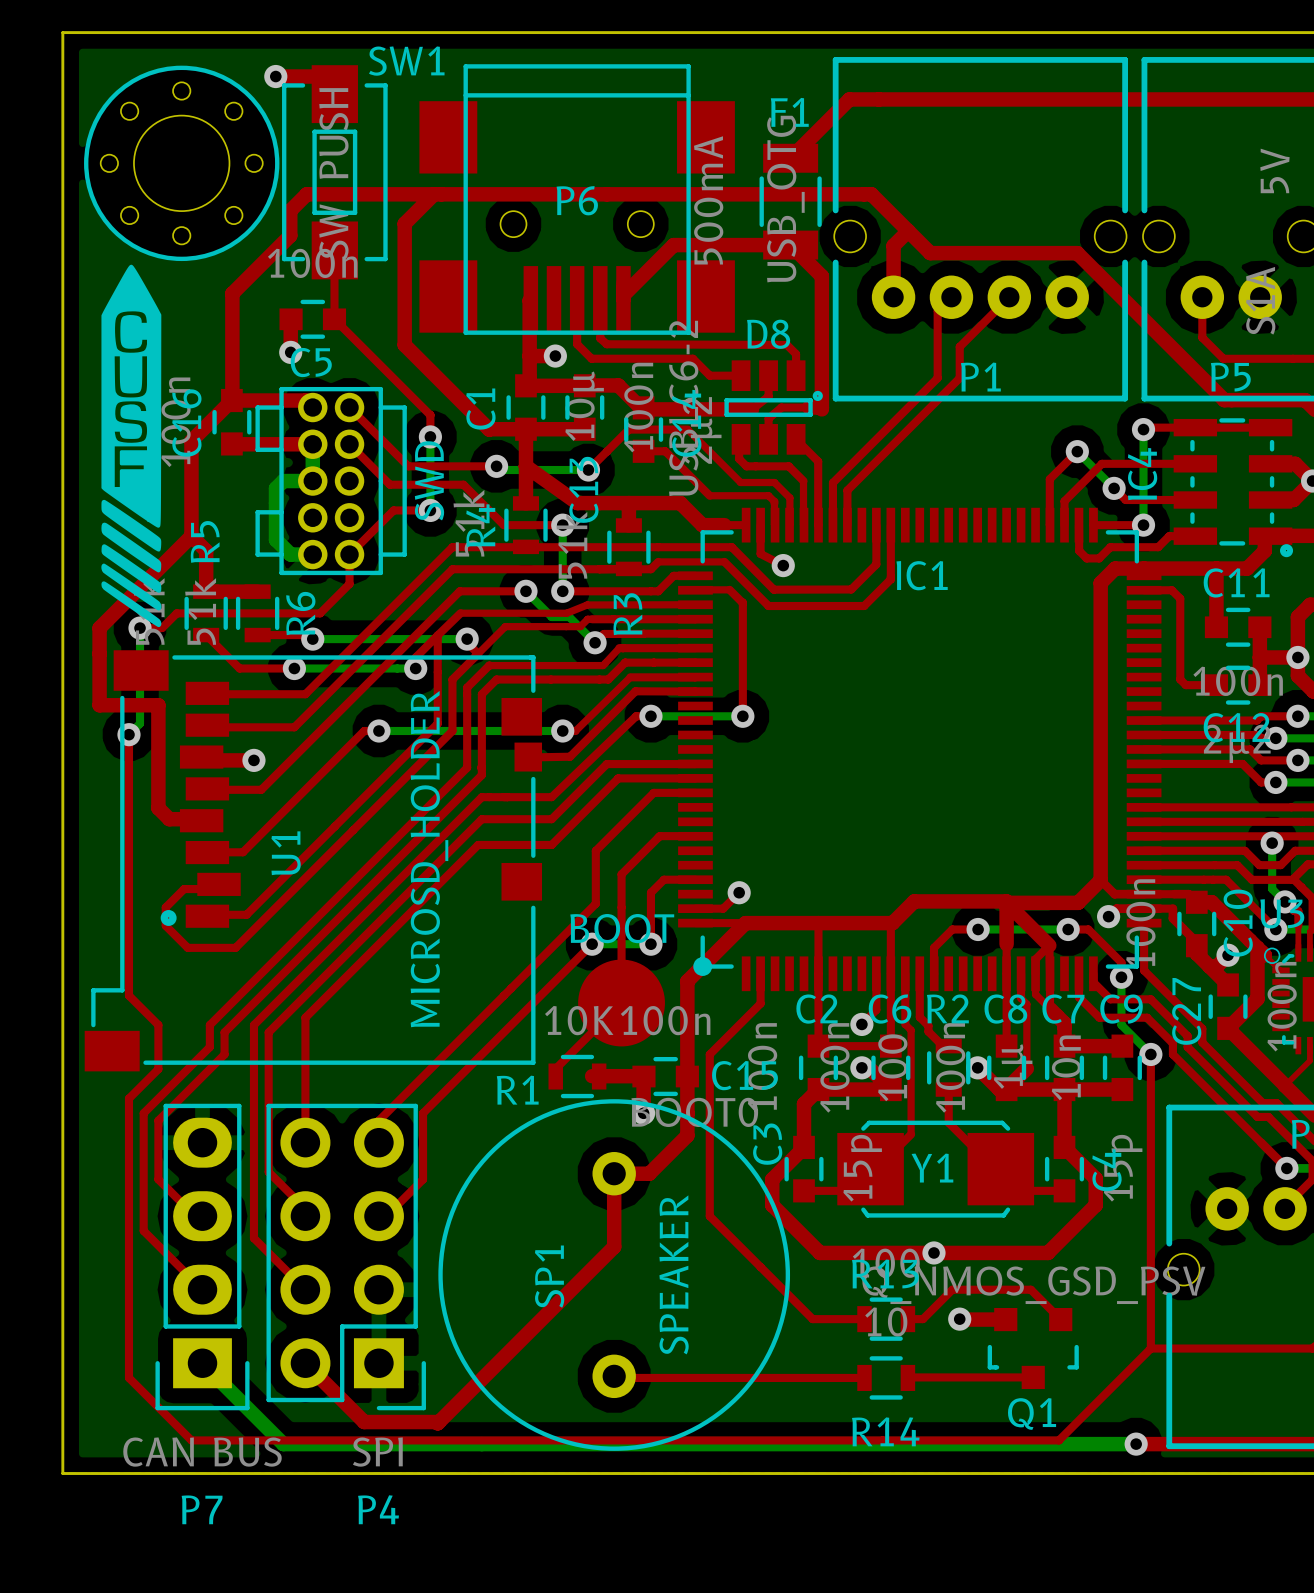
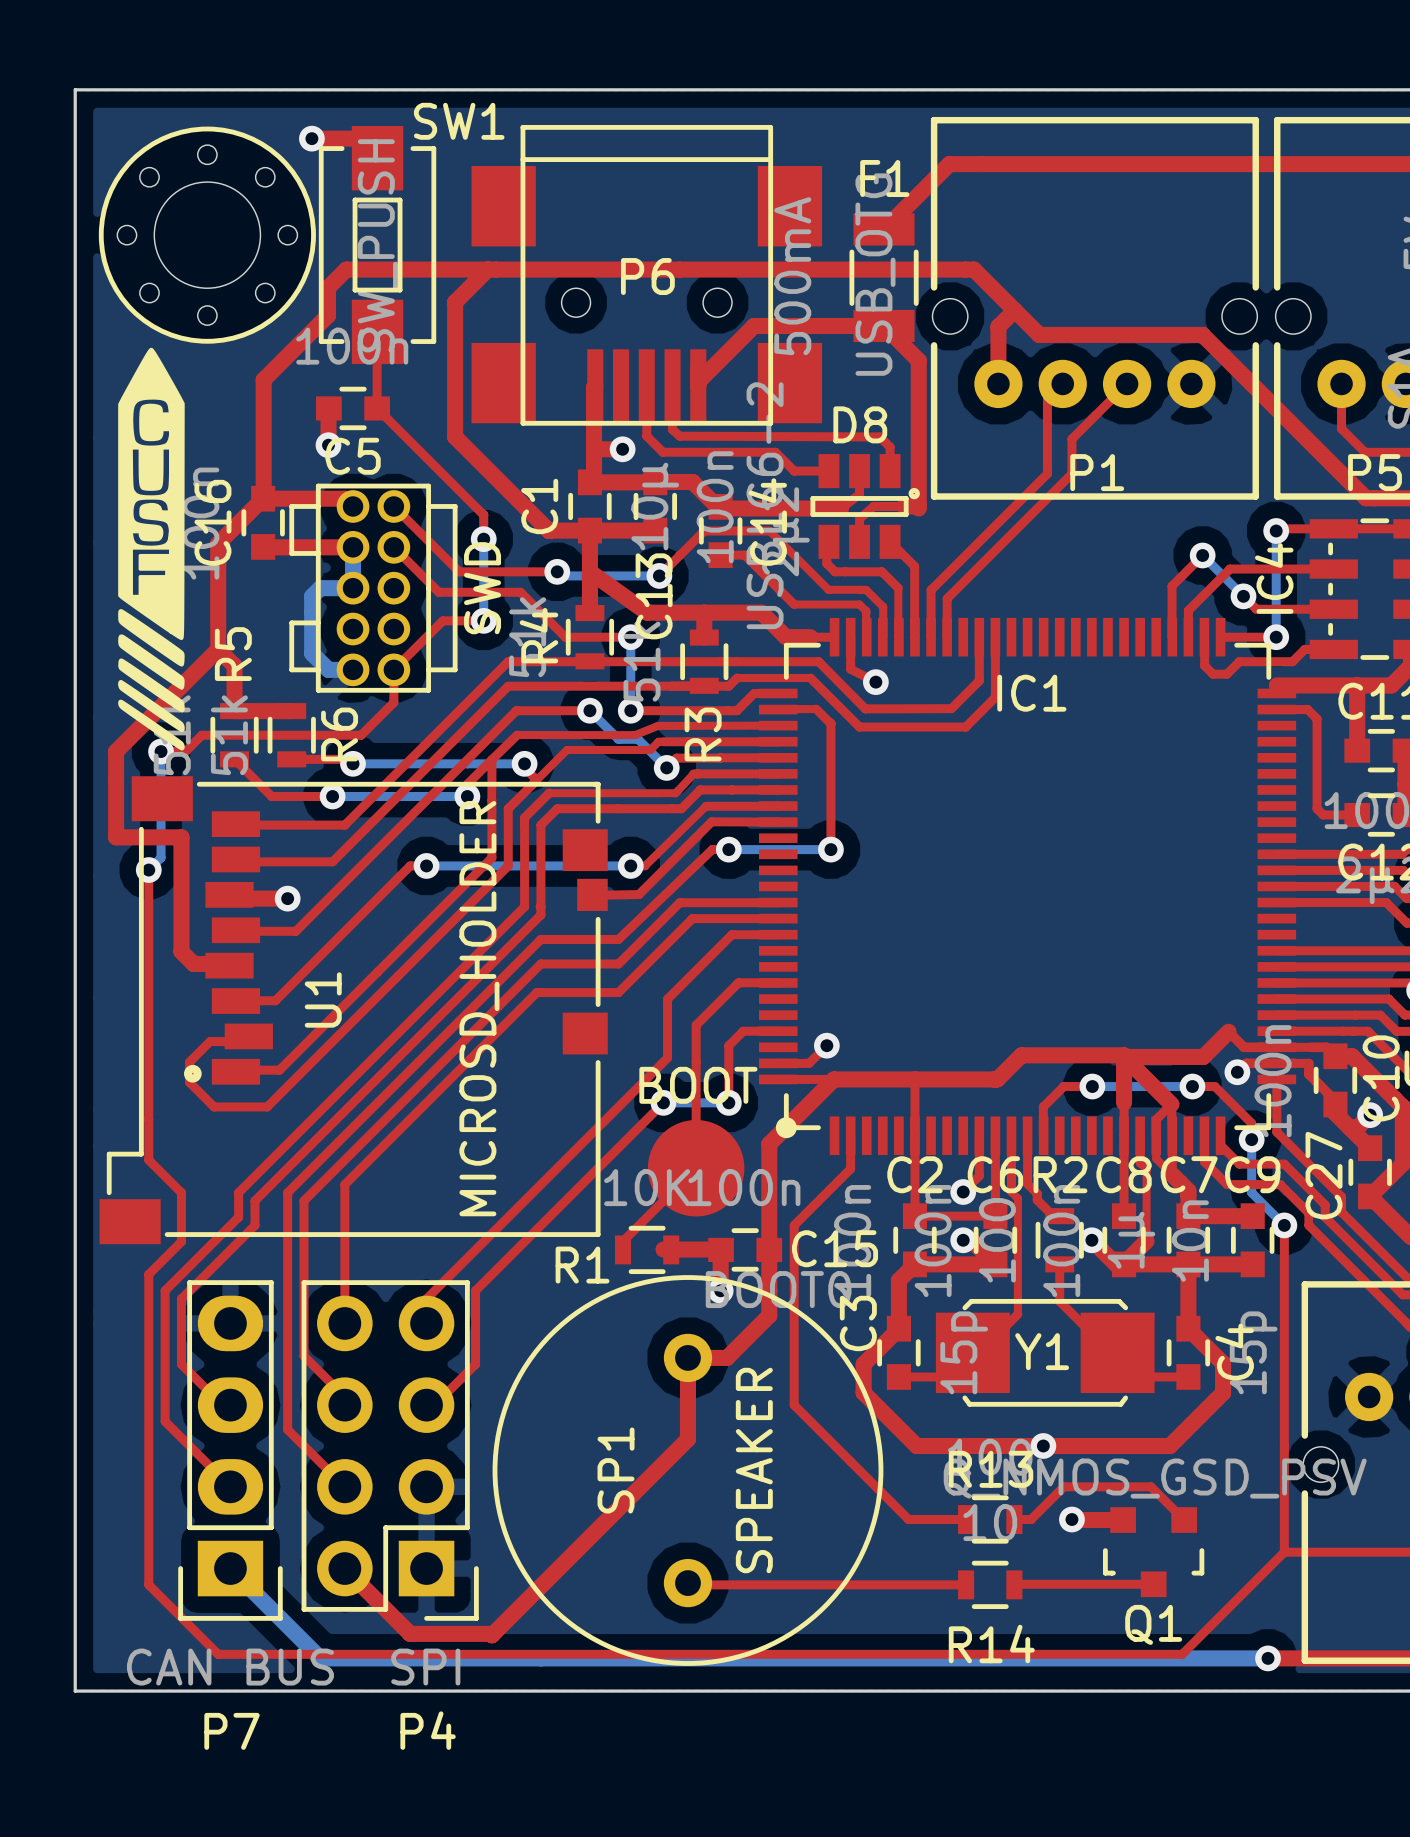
top track: (1144, 568) (1115, 568) (1100, 583) (1100, 880) -> none
top track: (890, 923) (890, 973) -> none

